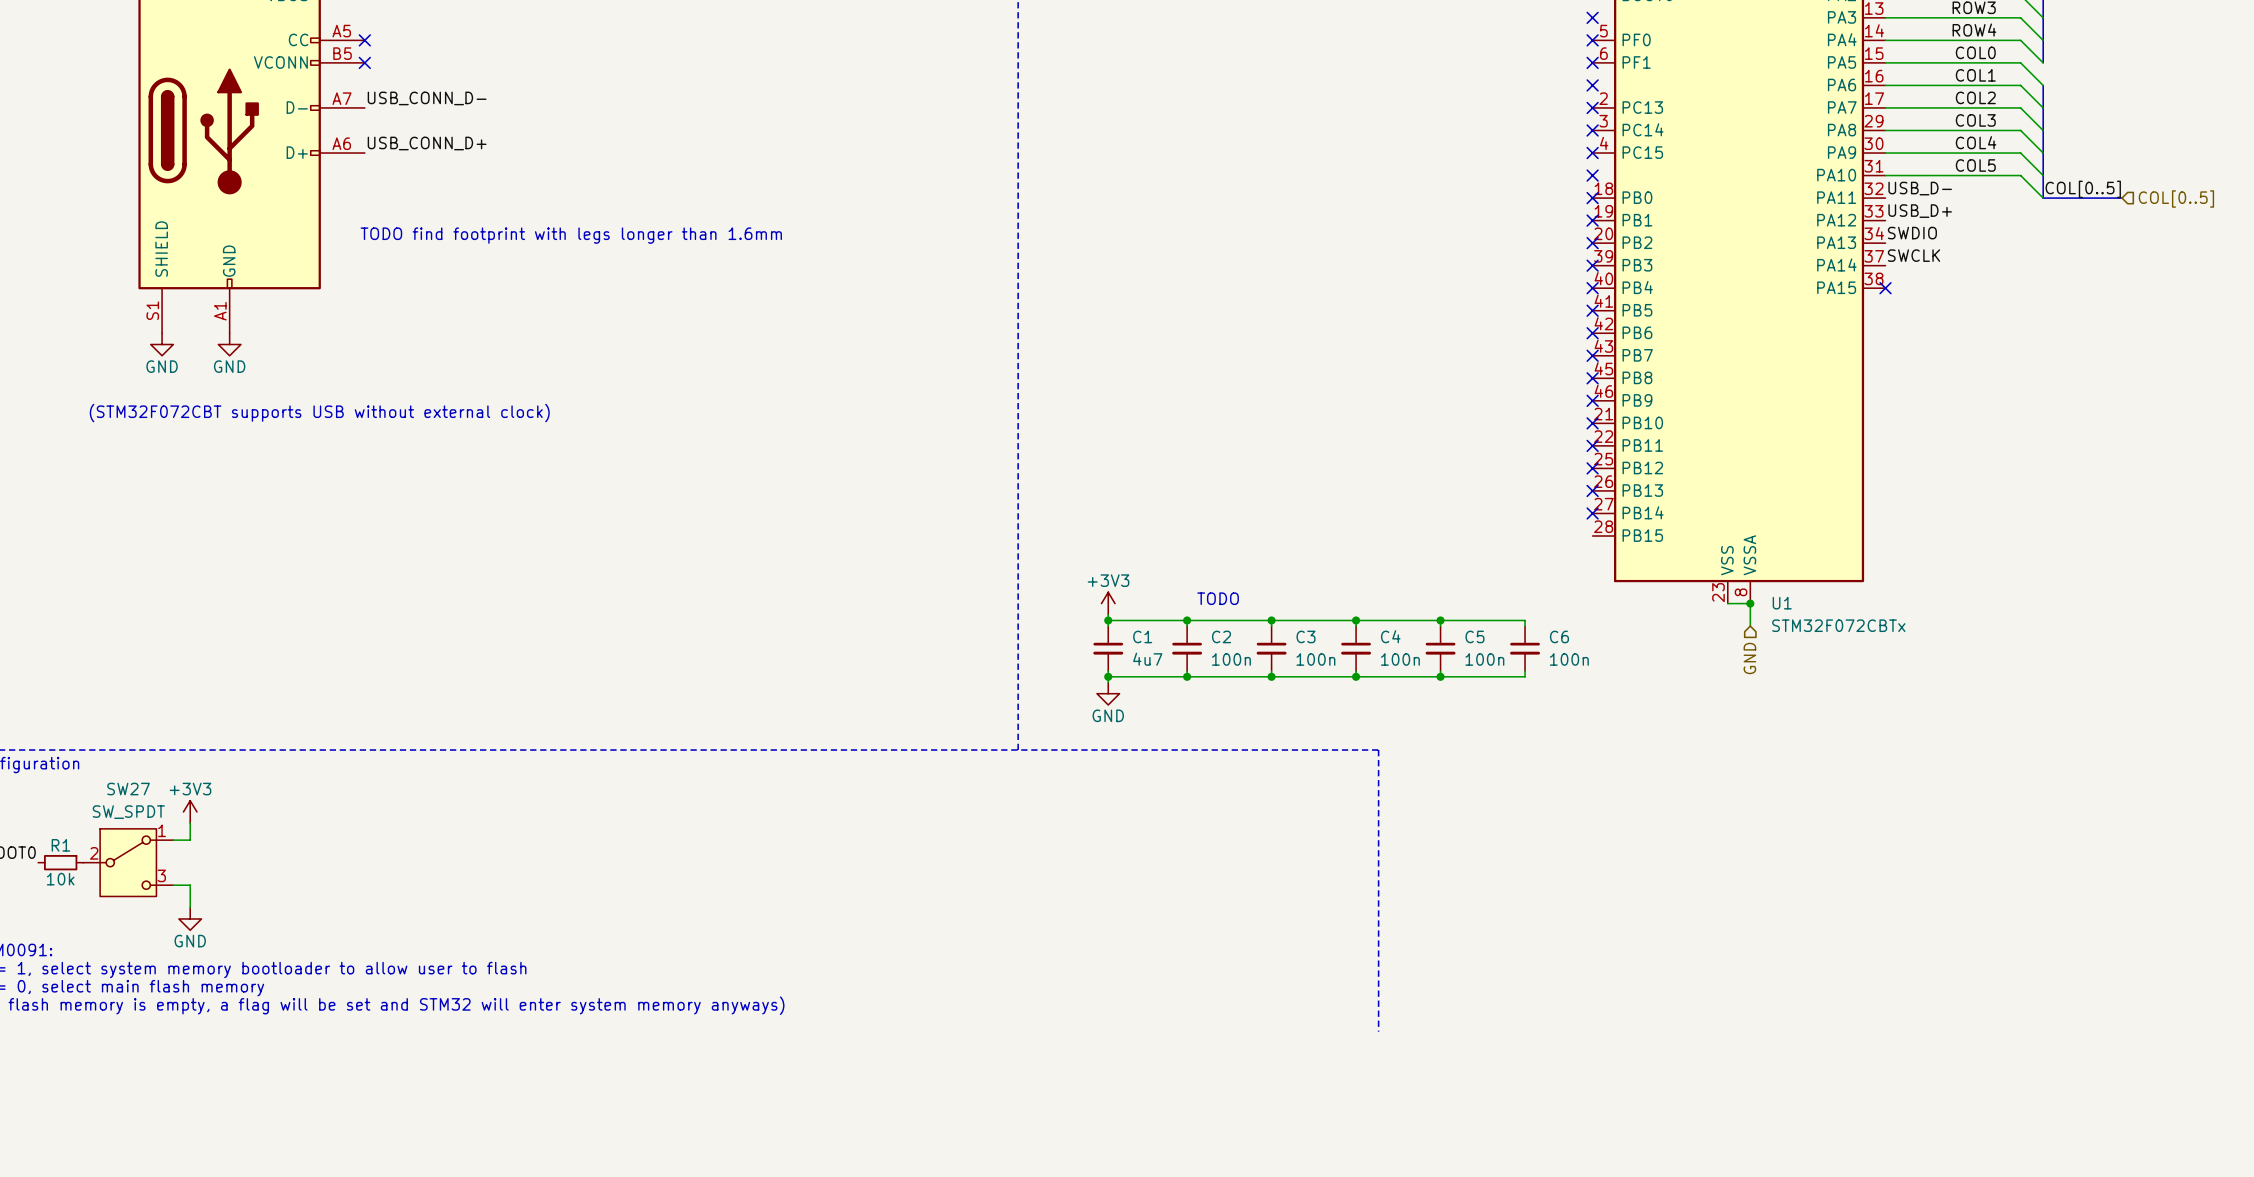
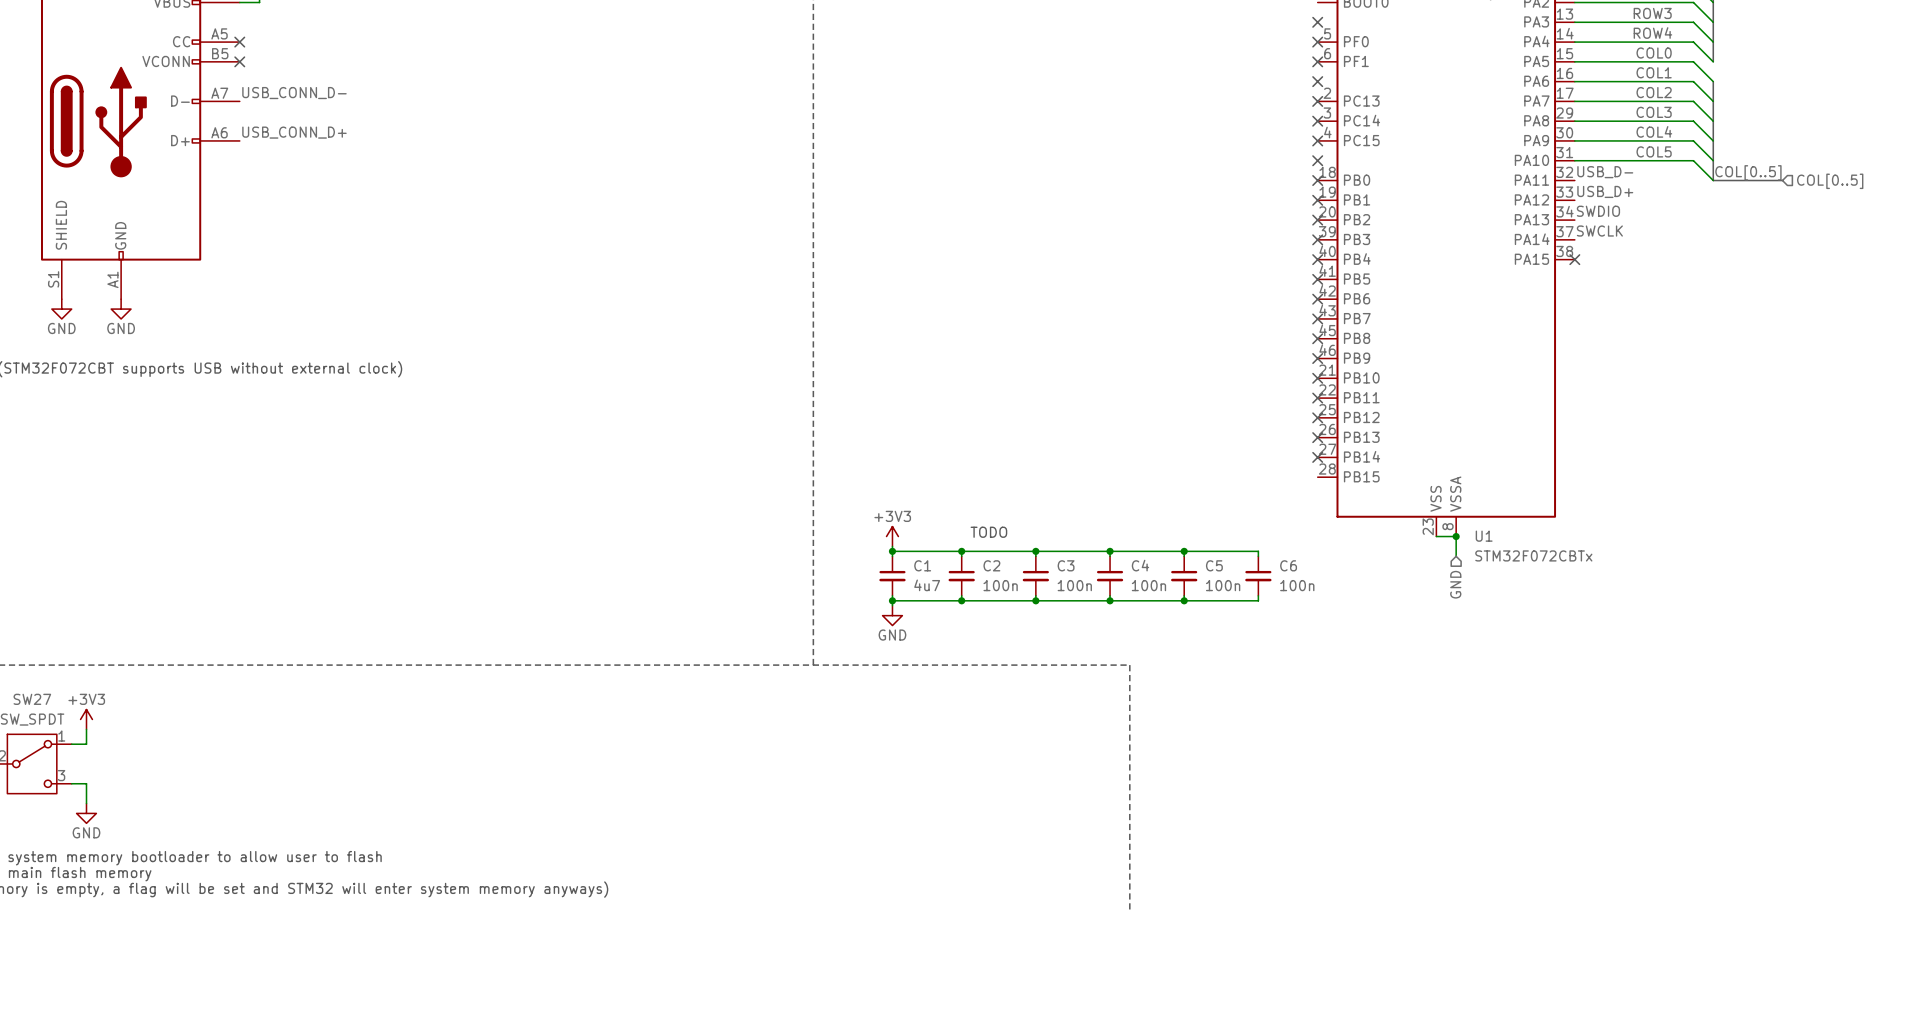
text: TODO find footprint with legs longer than 1.6mm (571, 235) -> none

